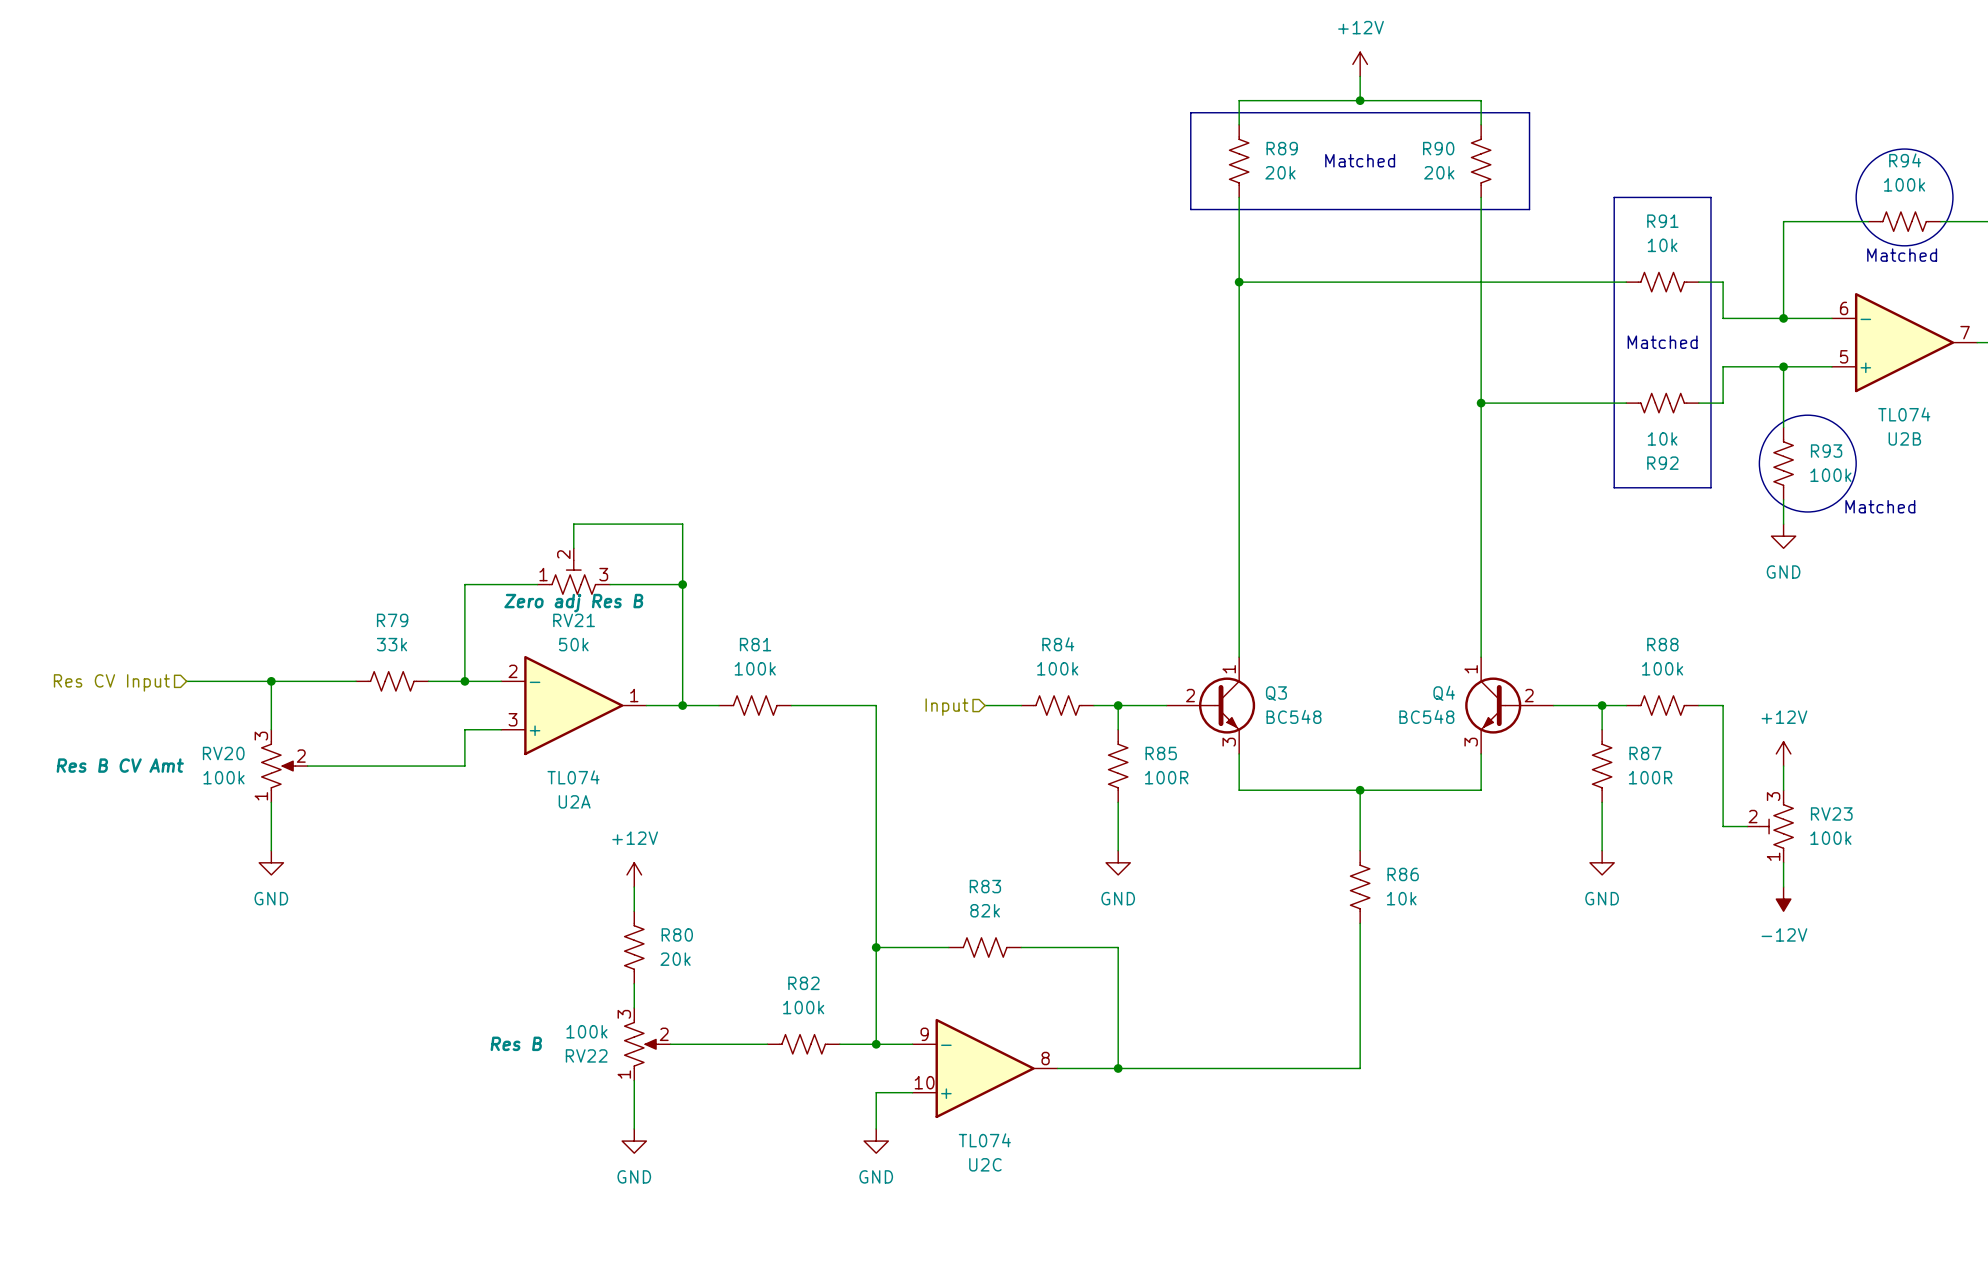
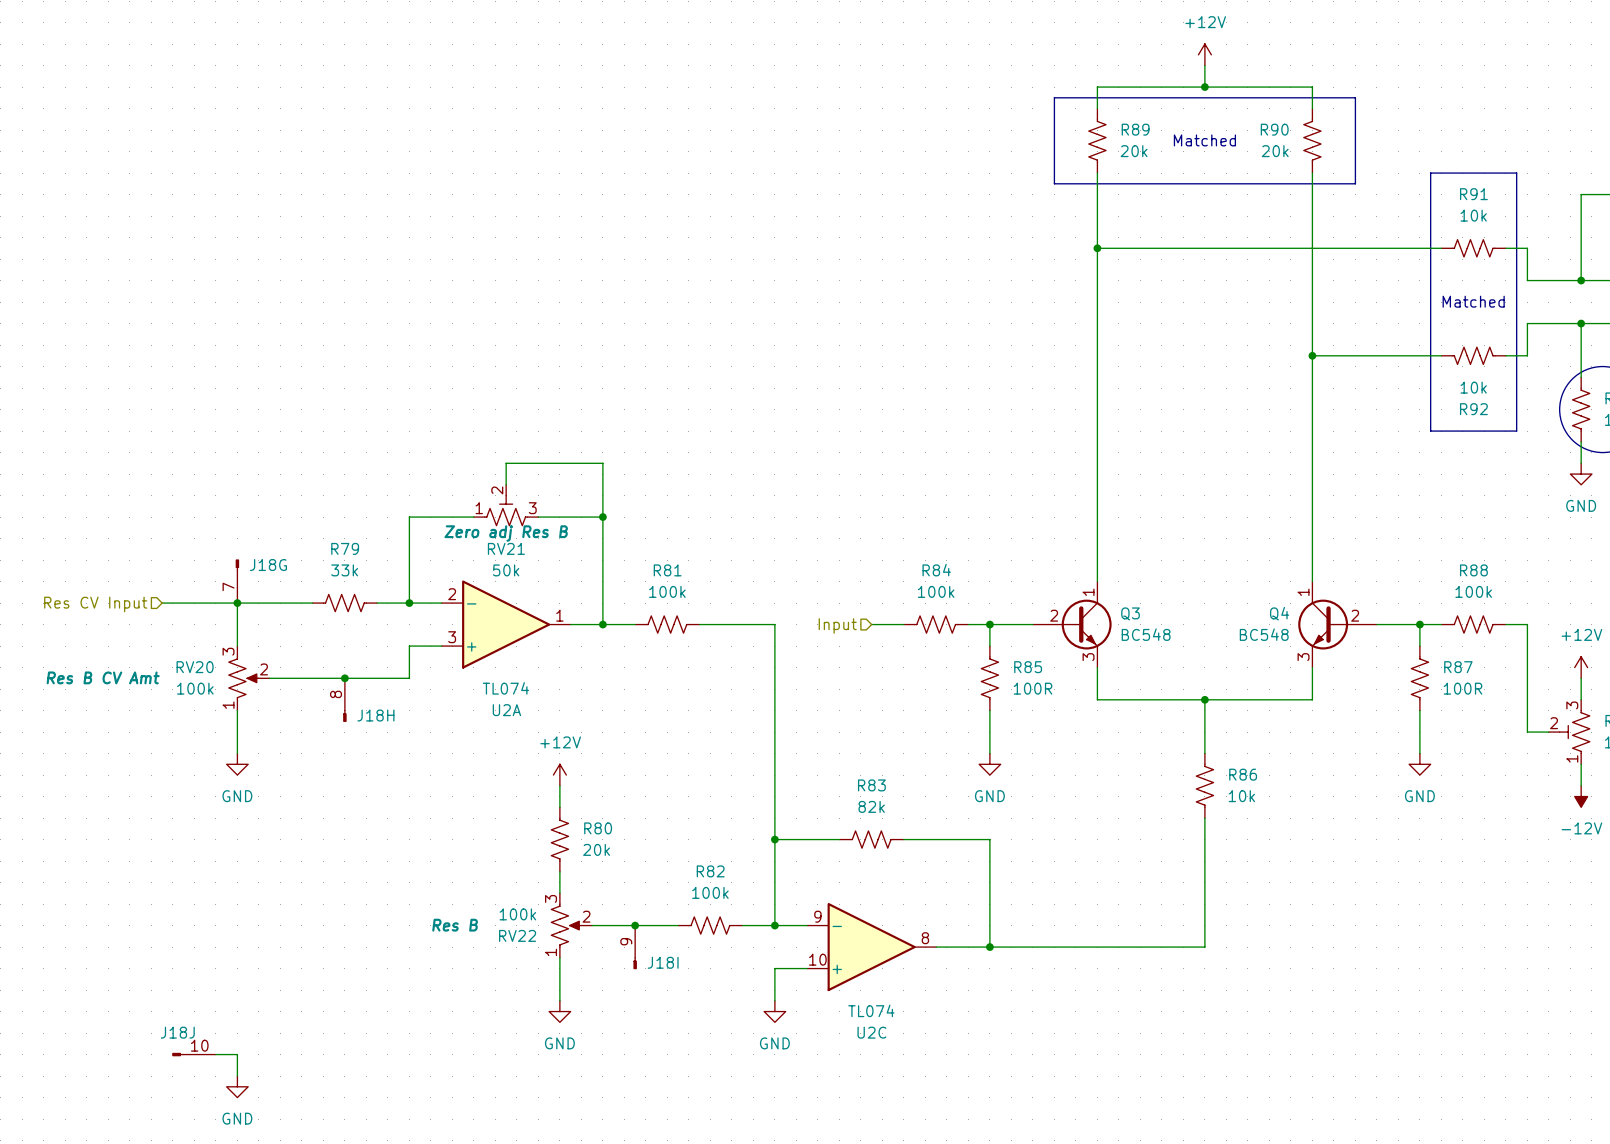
J18G: none -> (237, 581)
junction: none -> (344, 678)
J18H: none -> (344, 700)
junction: none -> (635, 925)
J18I: none -> (635, 947)
J18J: none -> (194, 1054)
wire: none -> (215, 1054) (237, 1054) (237, 1076)
power symbol: none -> GND (237, 1086)

